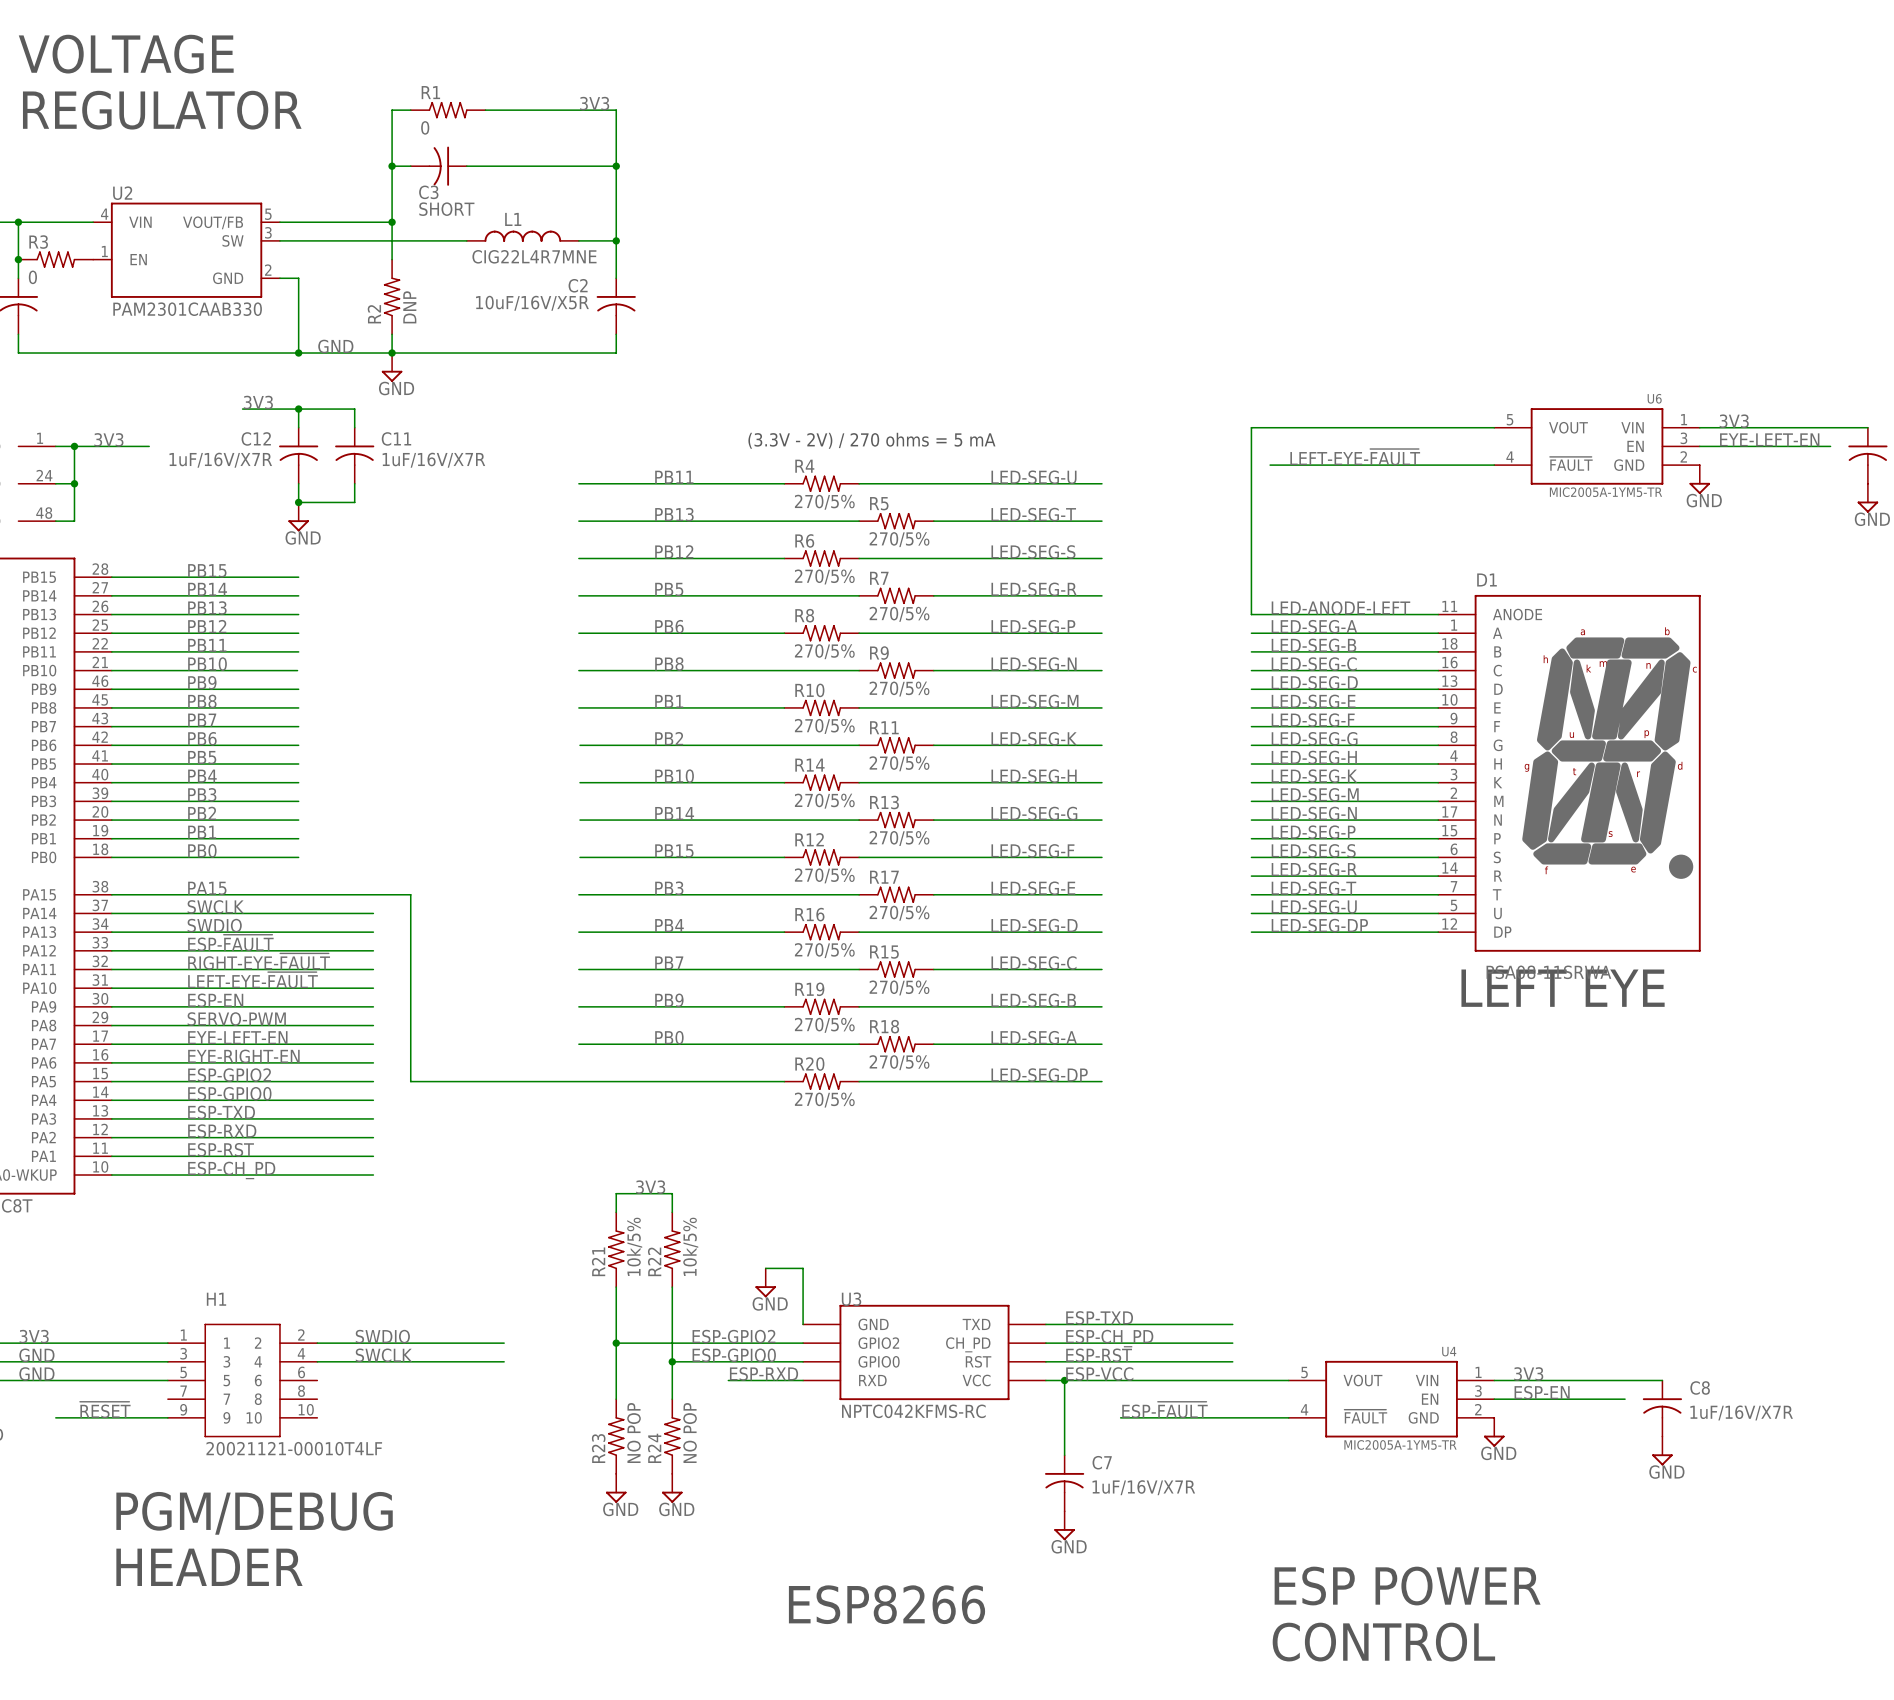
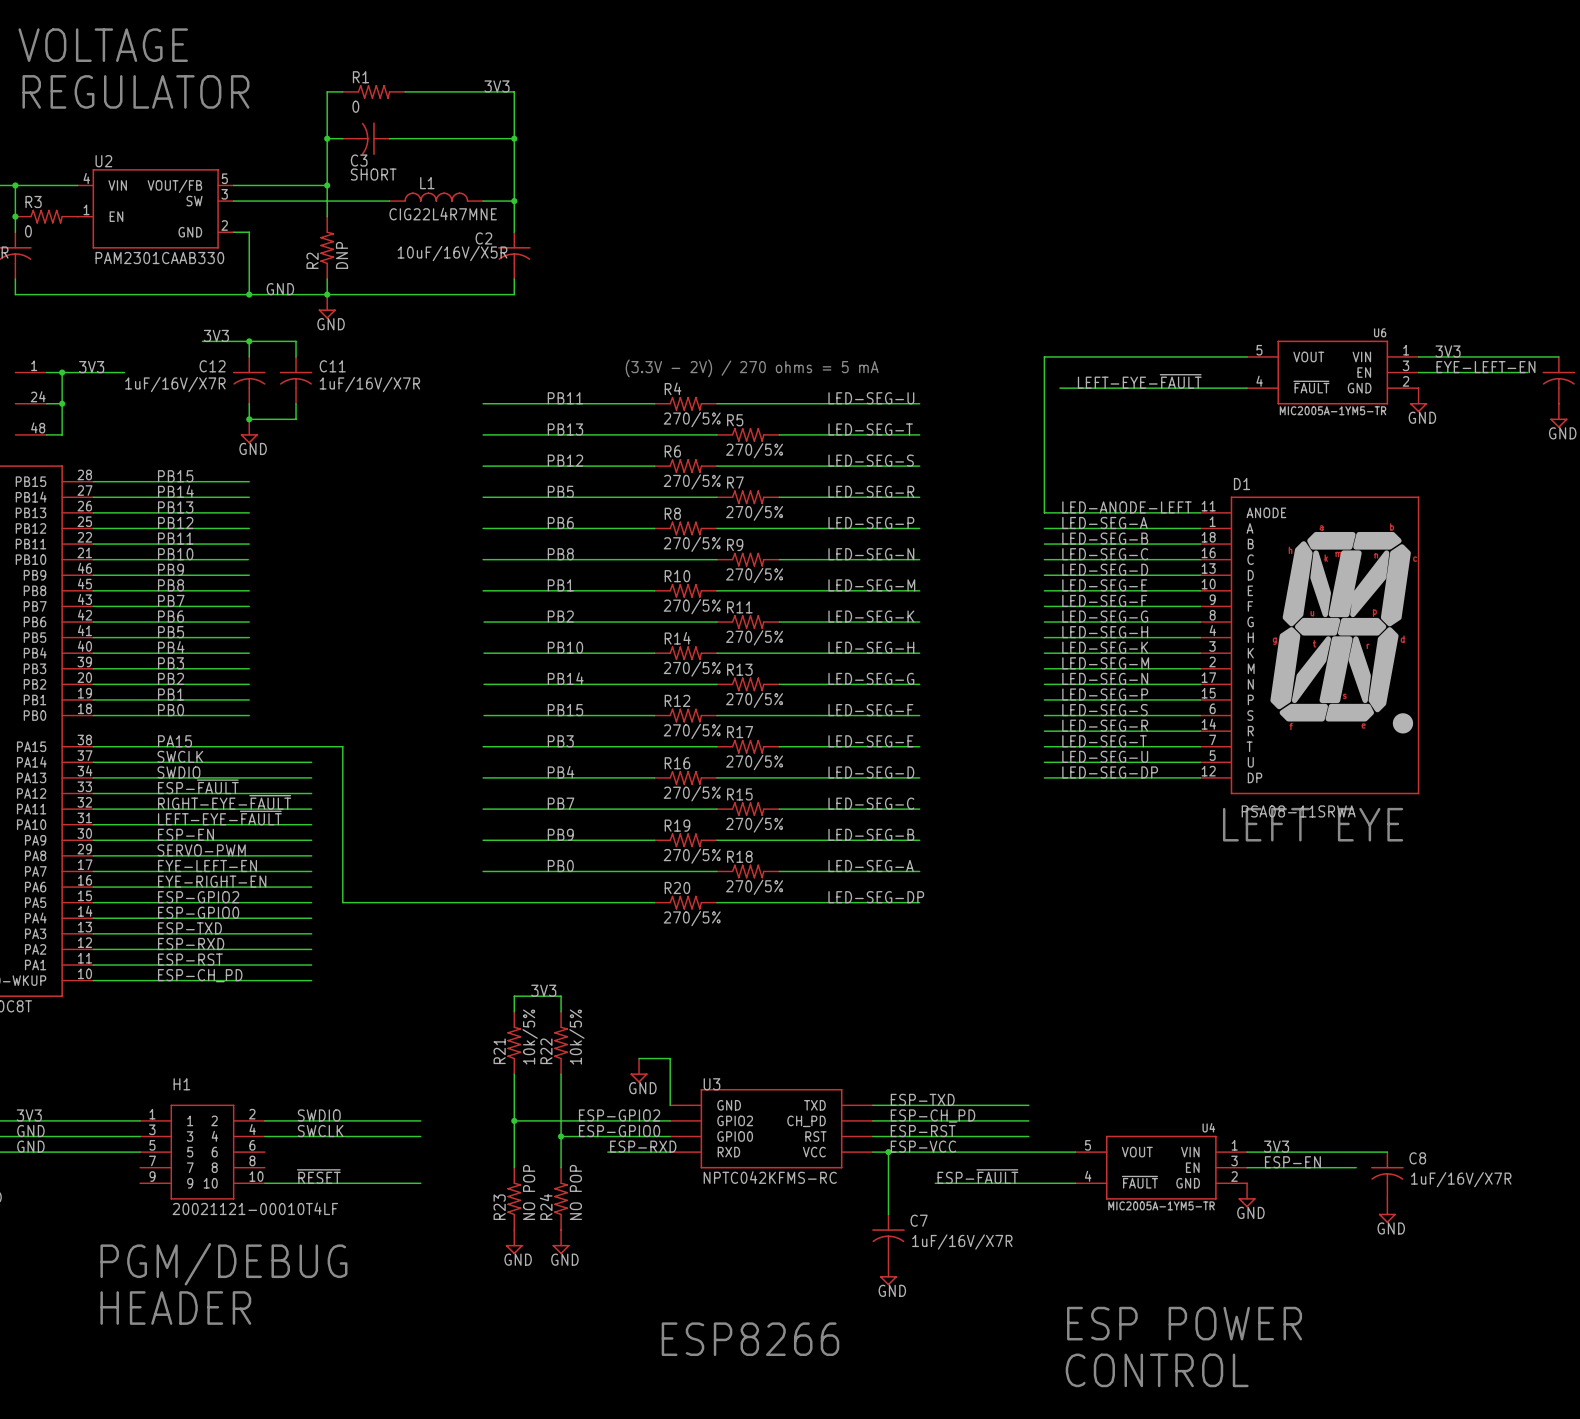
label: ~{RESET} (105, 1409) -> none
label: none -> ~{RESET} (318, 1176)
wire: (55, 1417) (167, 1417) -> none
wire: none -> (264, 1183) (420, 1183)

